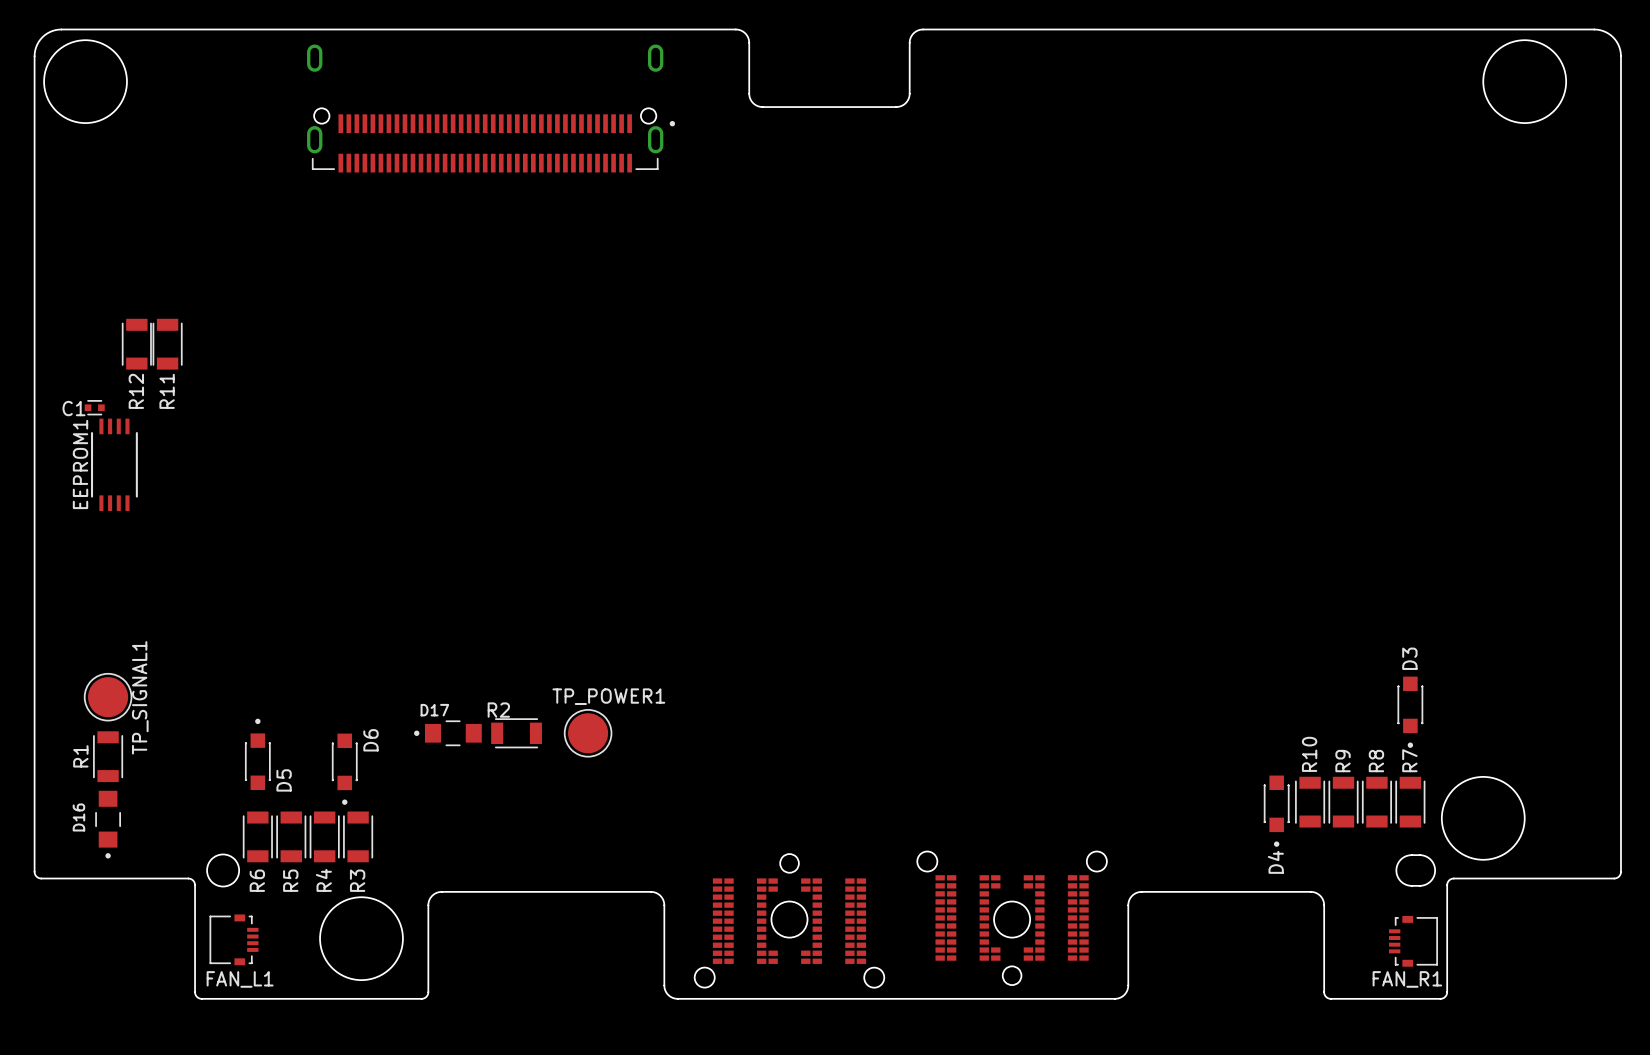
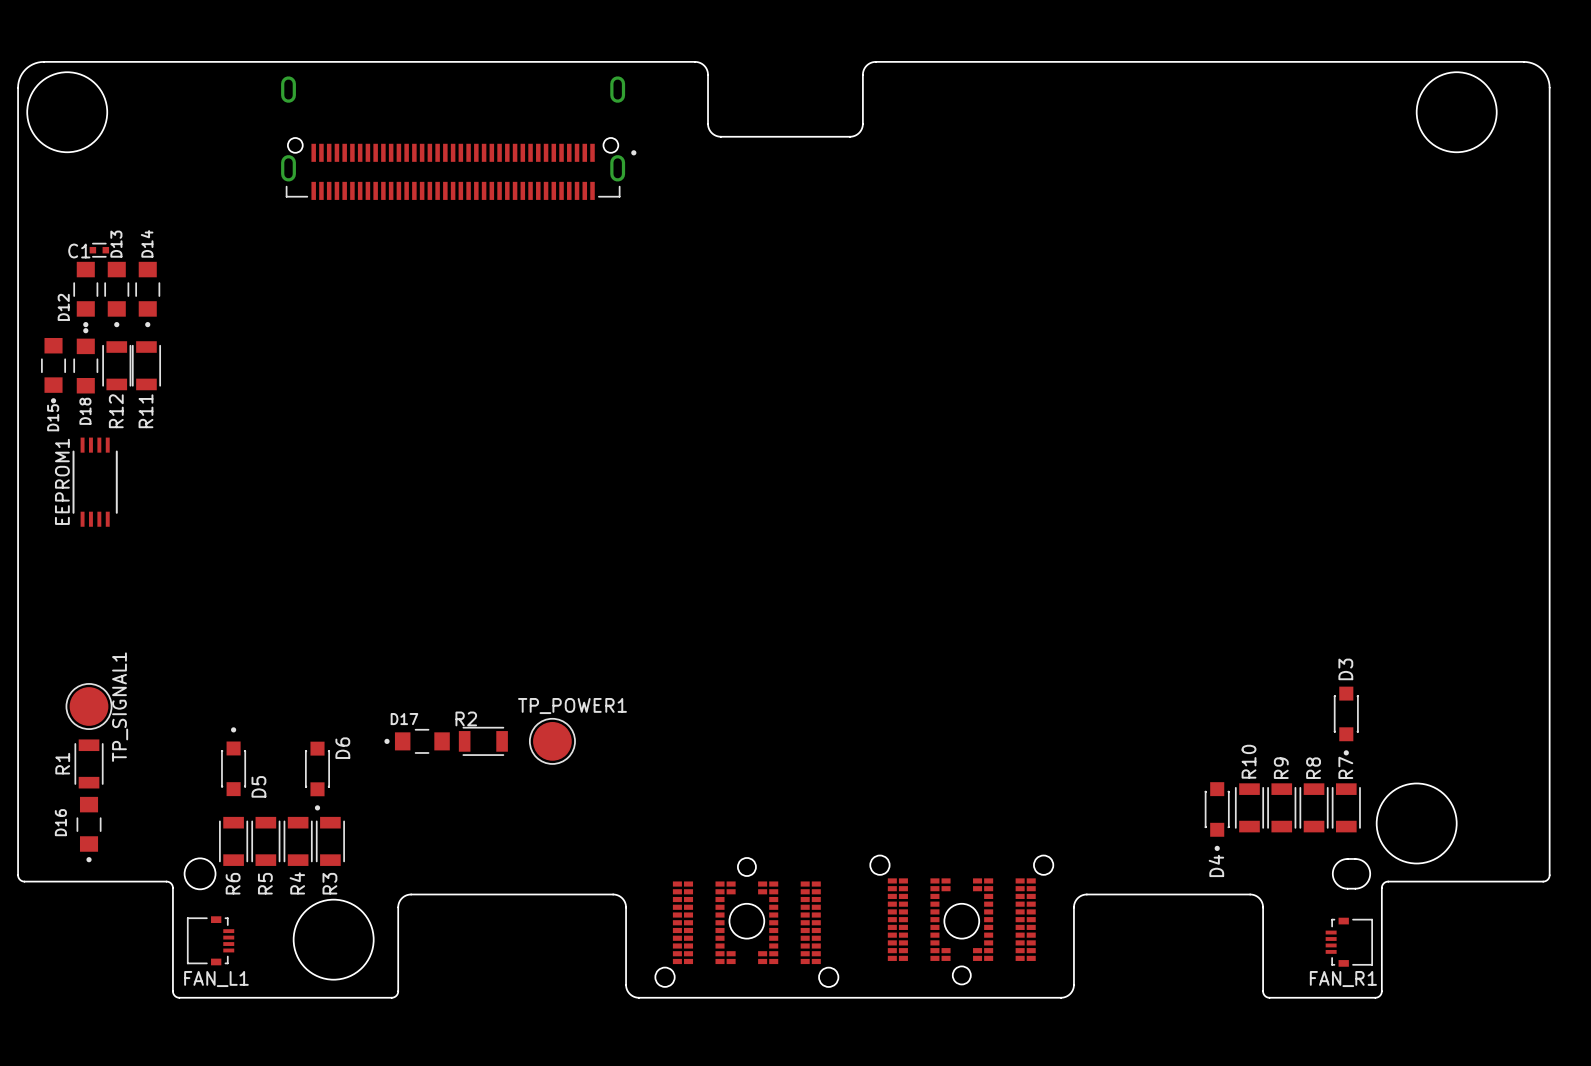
D12: none -> (85, 294)
D13: none -> (116, 294)
D14: none -> (147, 294)
D18: none -> (85, 360)
D15: none -> (53, 370)
C1 position: (94, 407) -> (99, 250)

